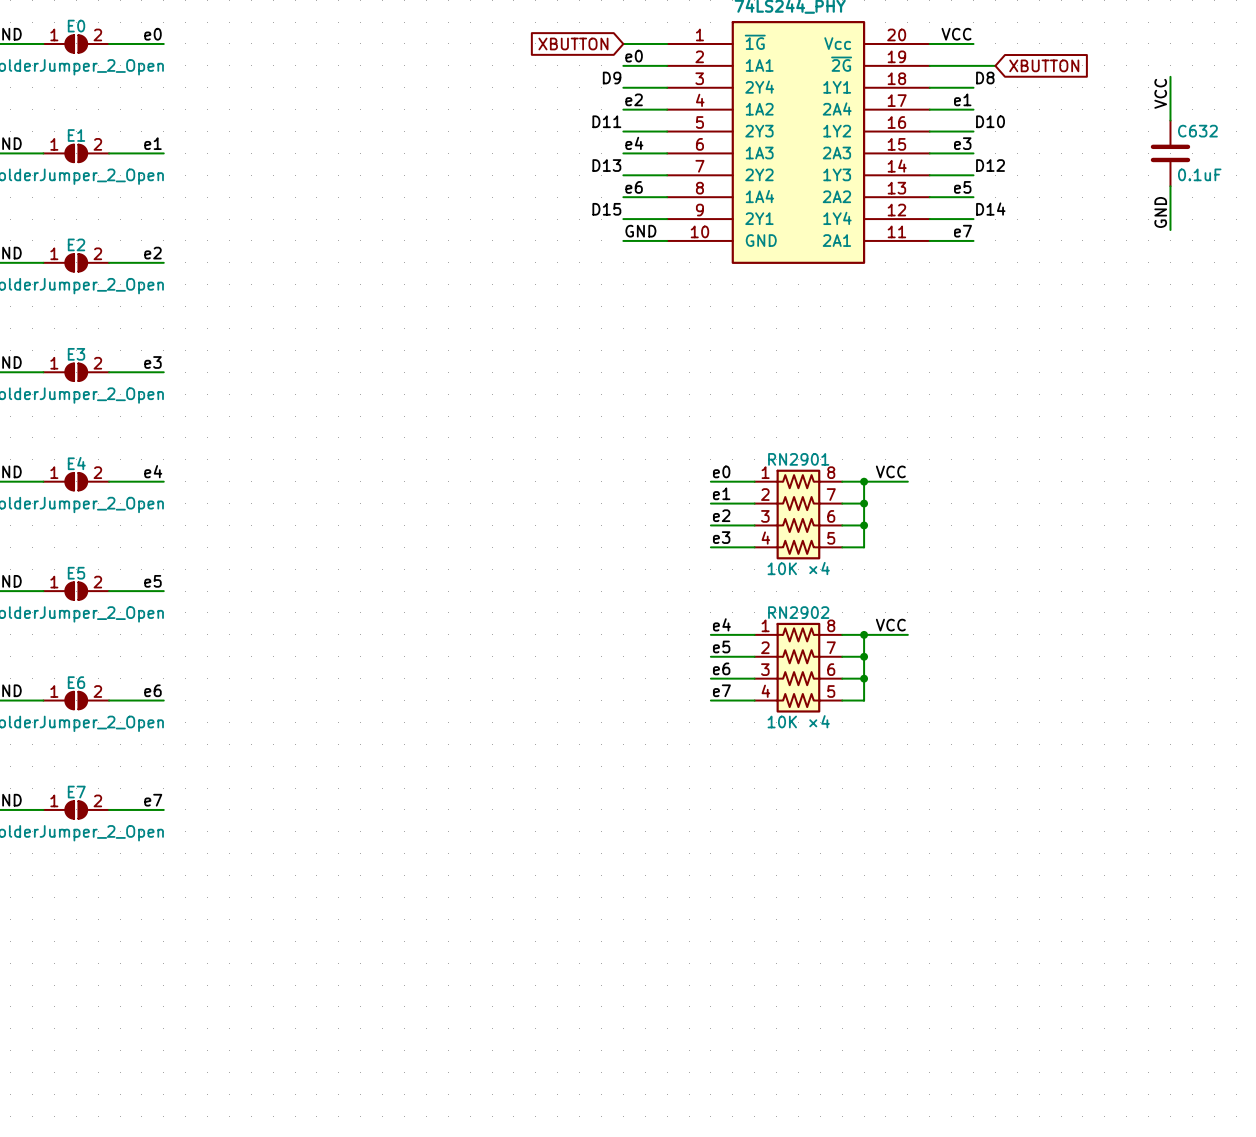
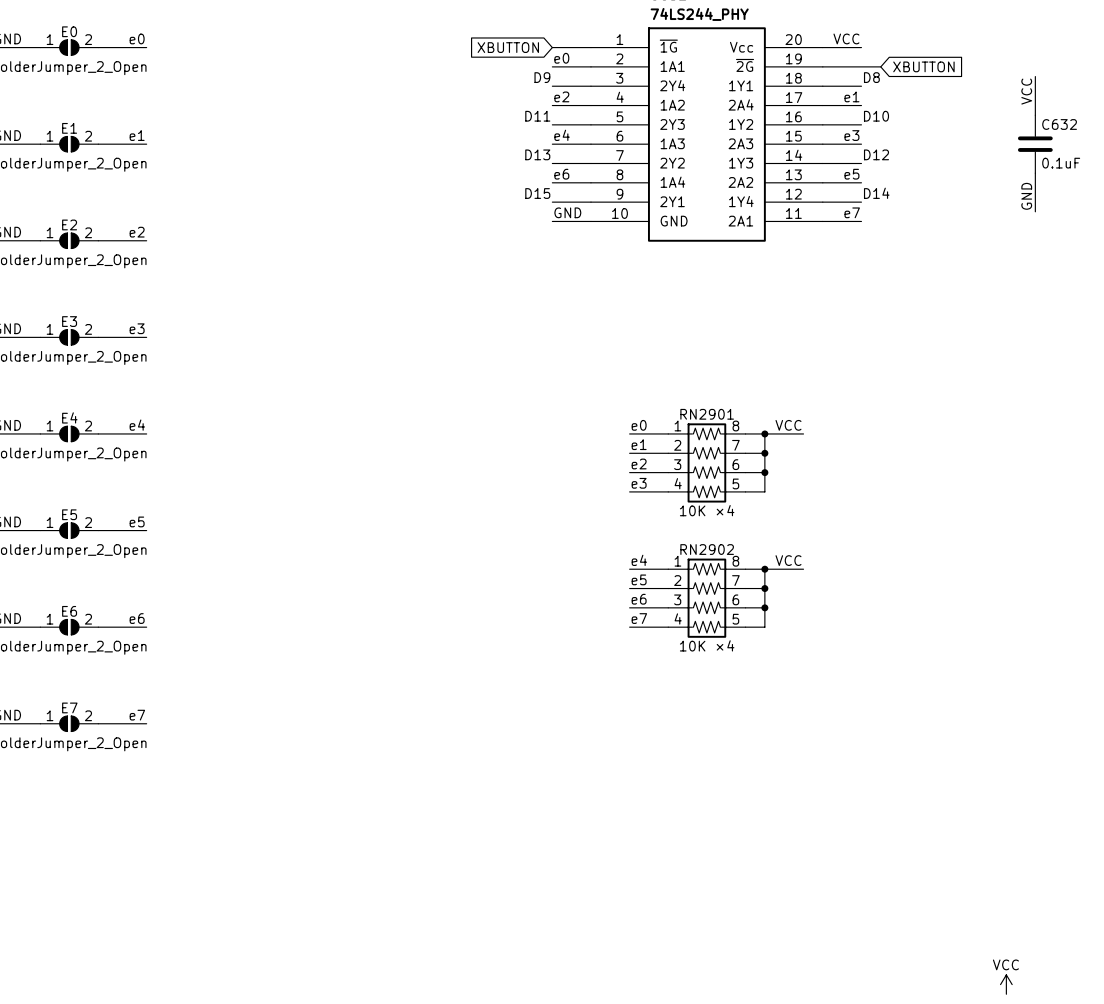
power symbol: none -> VCC (1006, 984)

